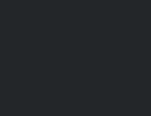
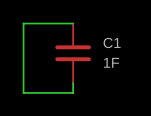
wire: none -> (73, 23) (23, 23) (23, 92) (73, 92) (73, 83)
C1: none -> 1F (73, 53)

